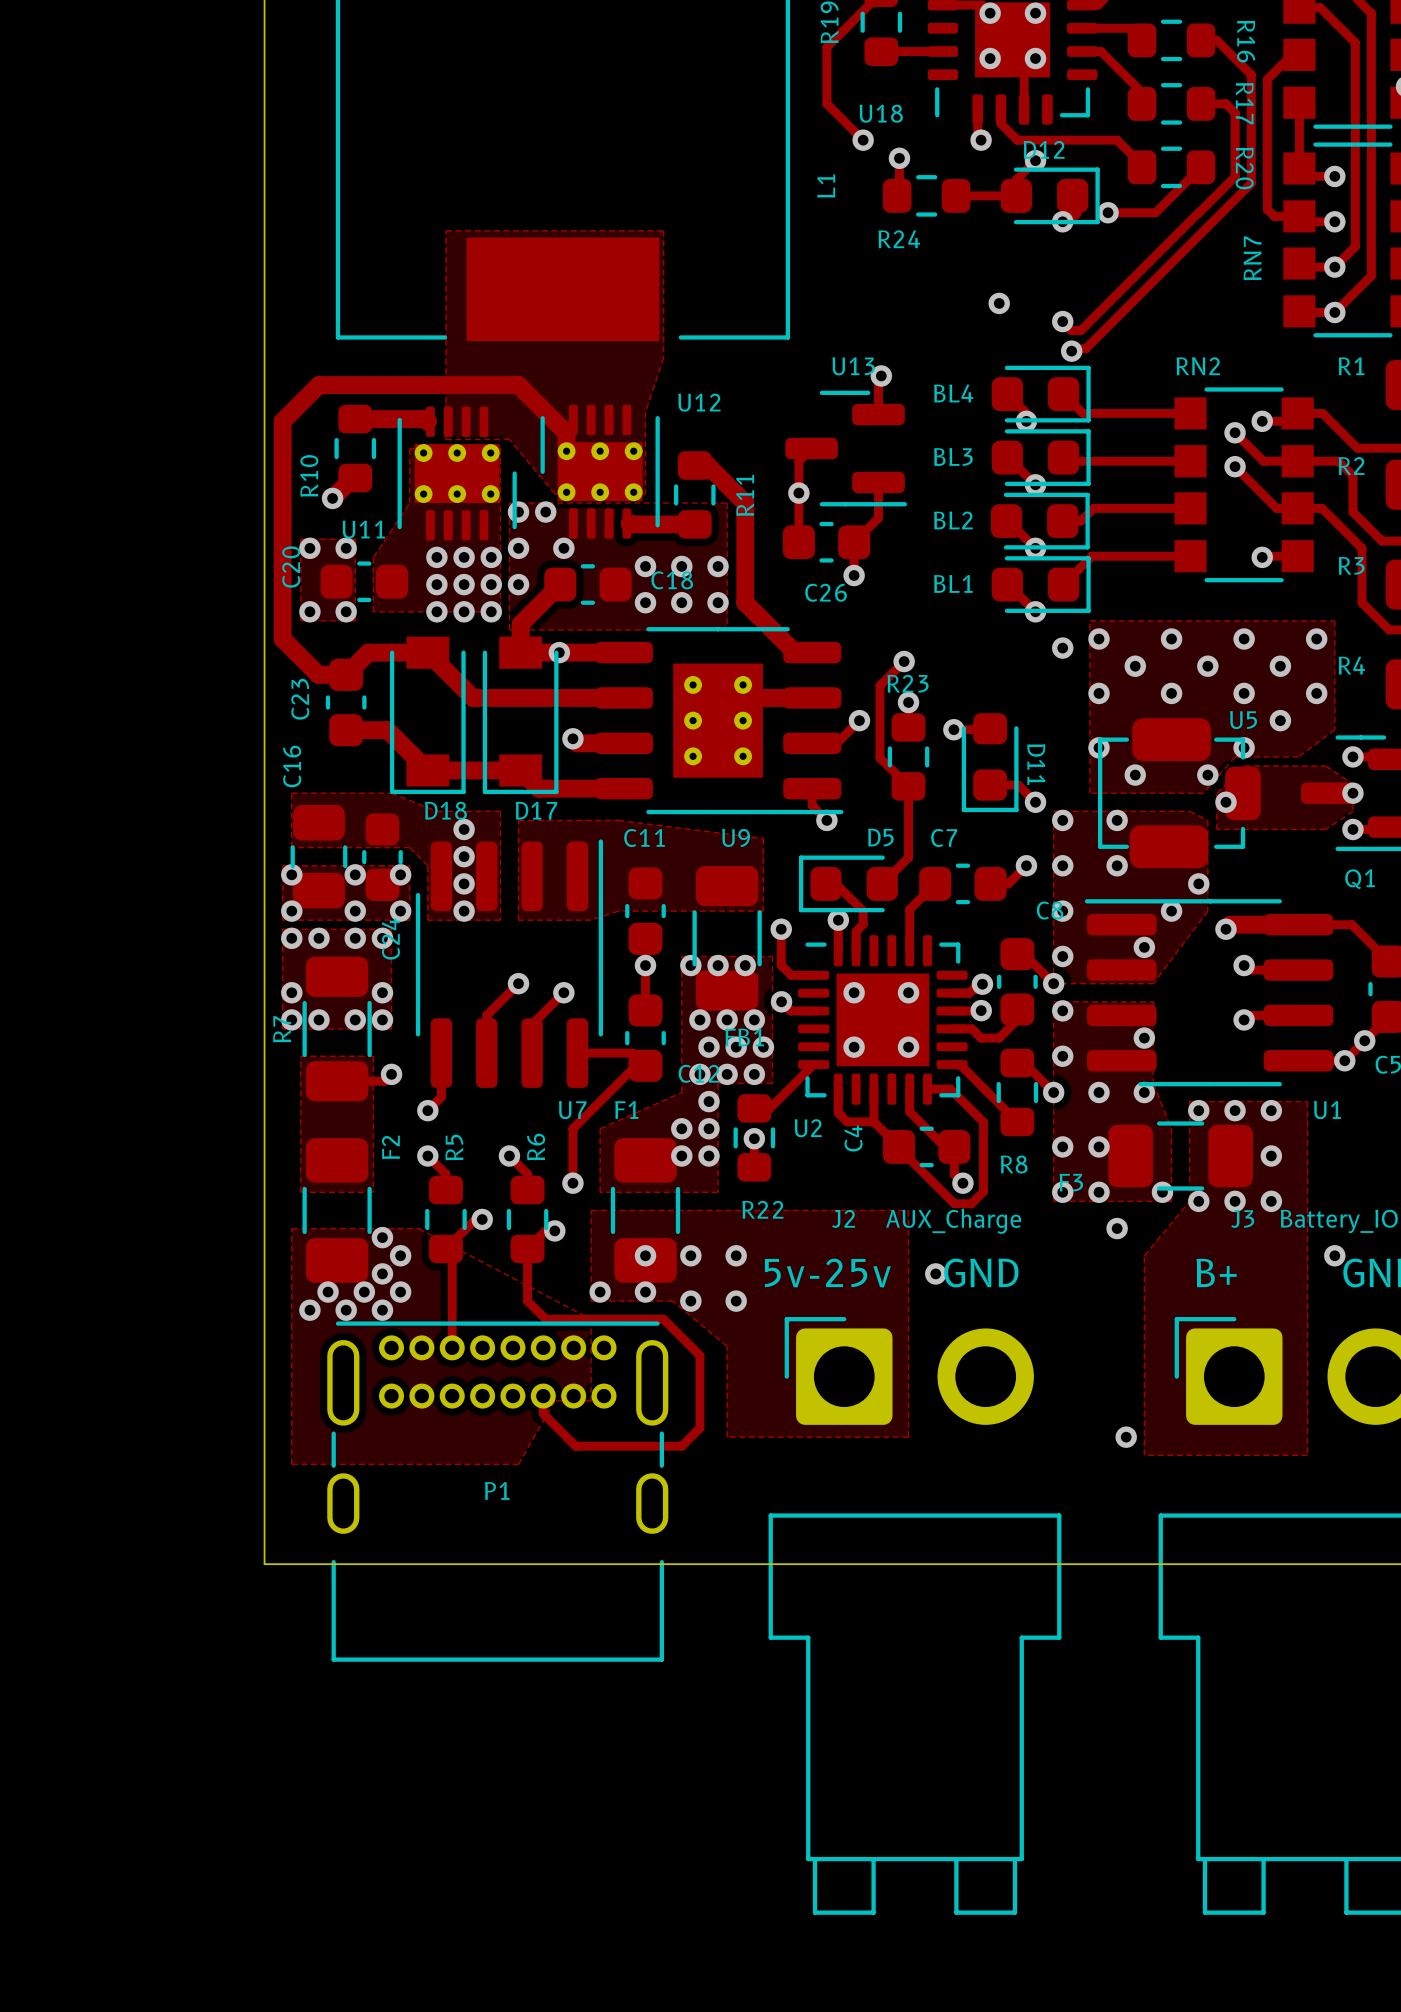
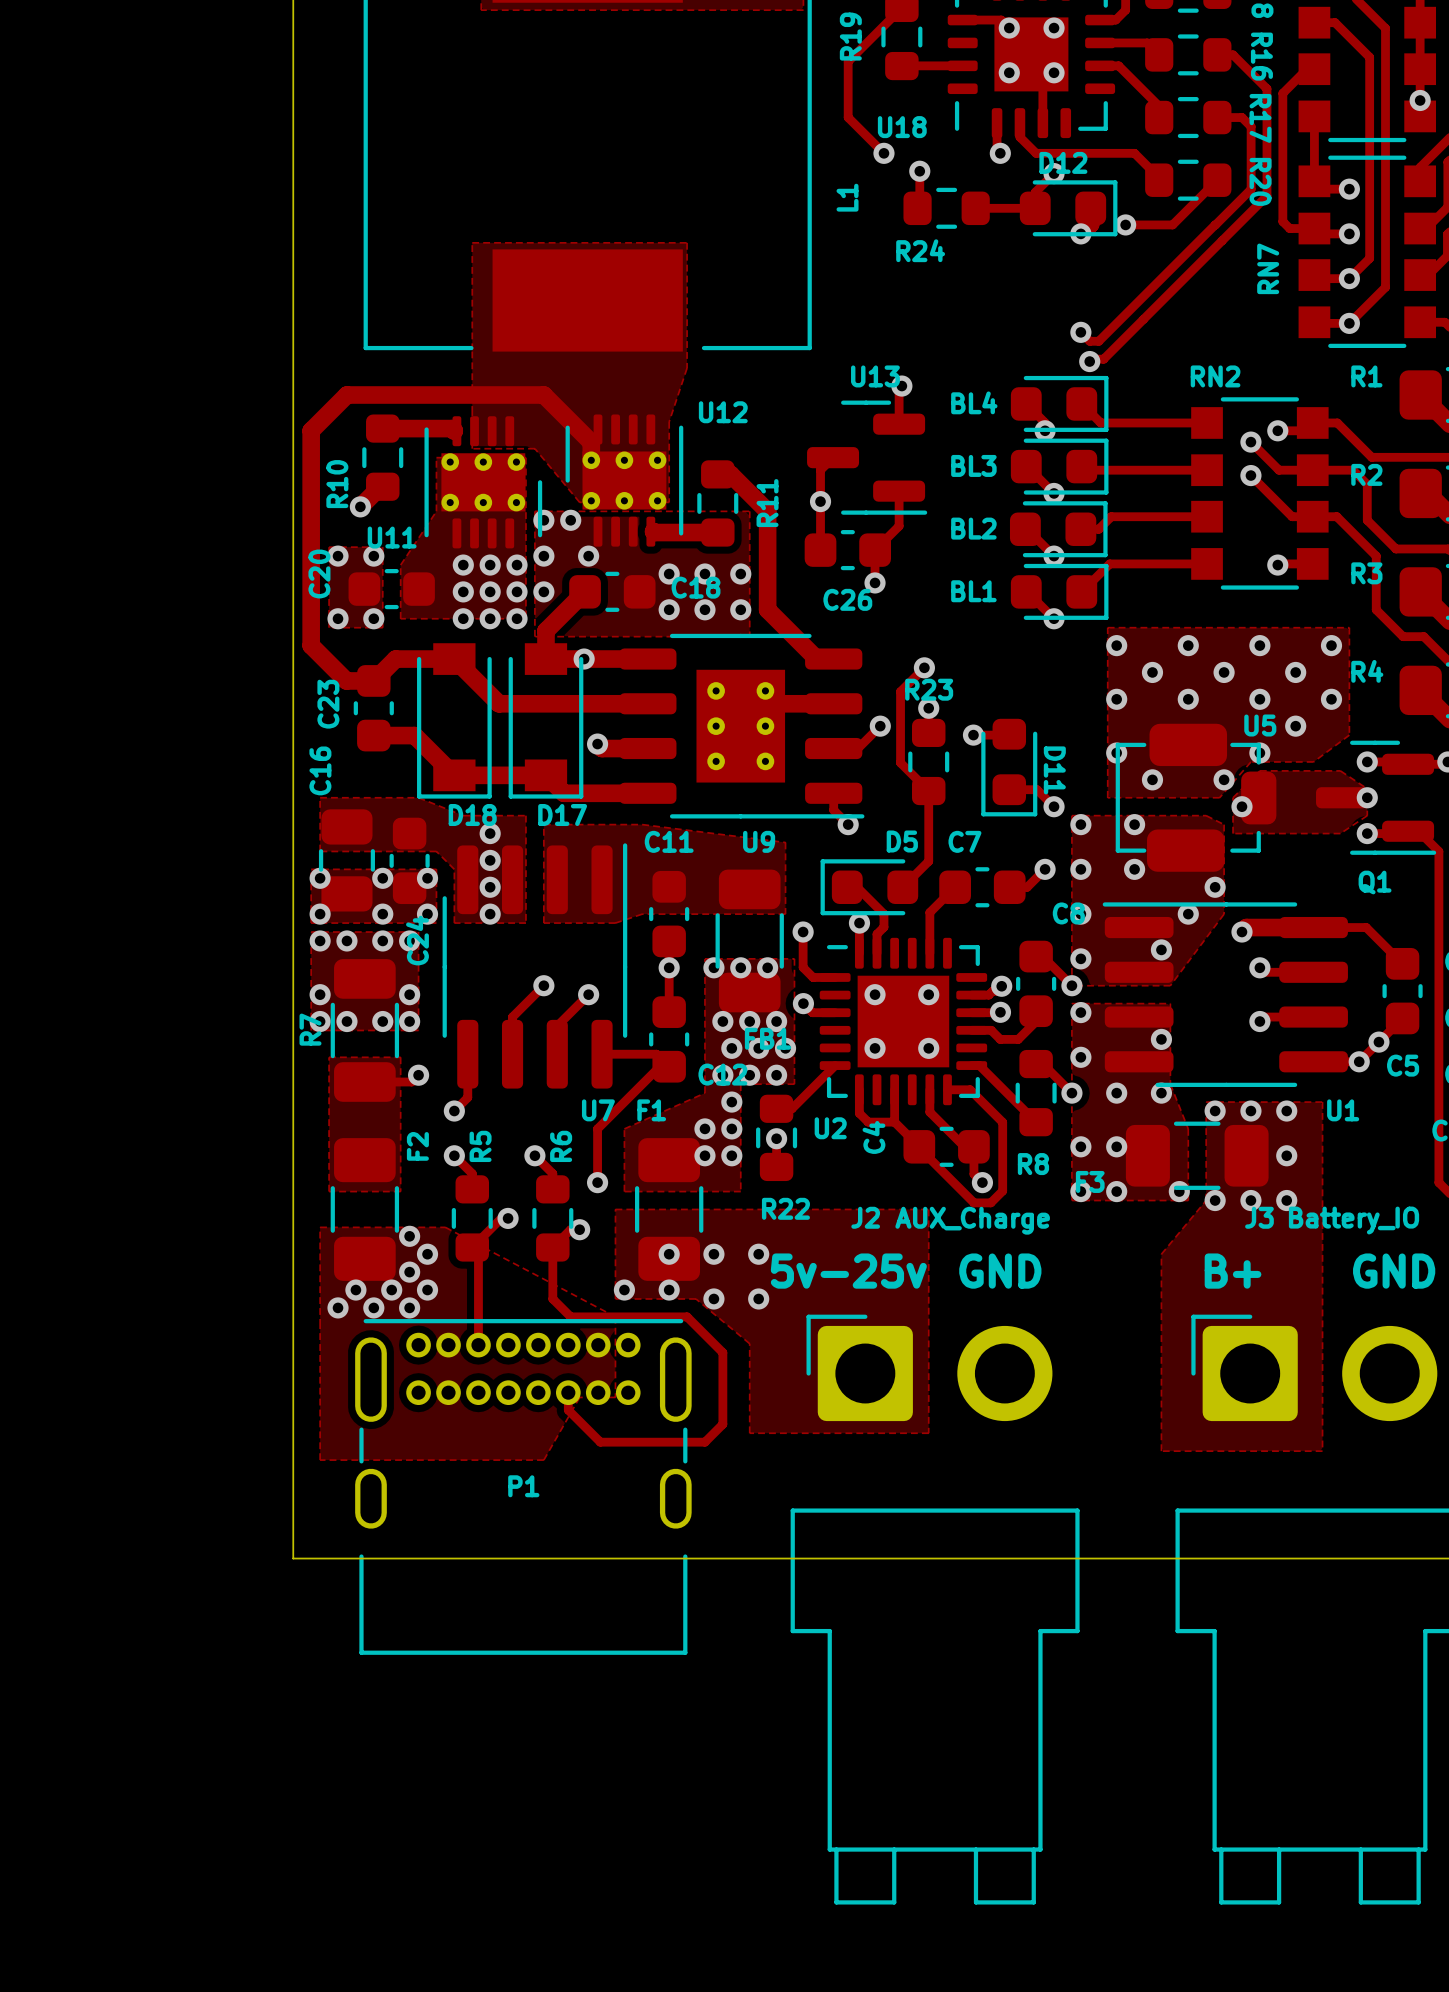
via: (999, 303) -> none
via: (1062, 648) -> none
via: (1117, 1228) -> none
via: (1334, 1255) -> none
via: (935, 1273) -> none
via: (1126, 1437) -> none

